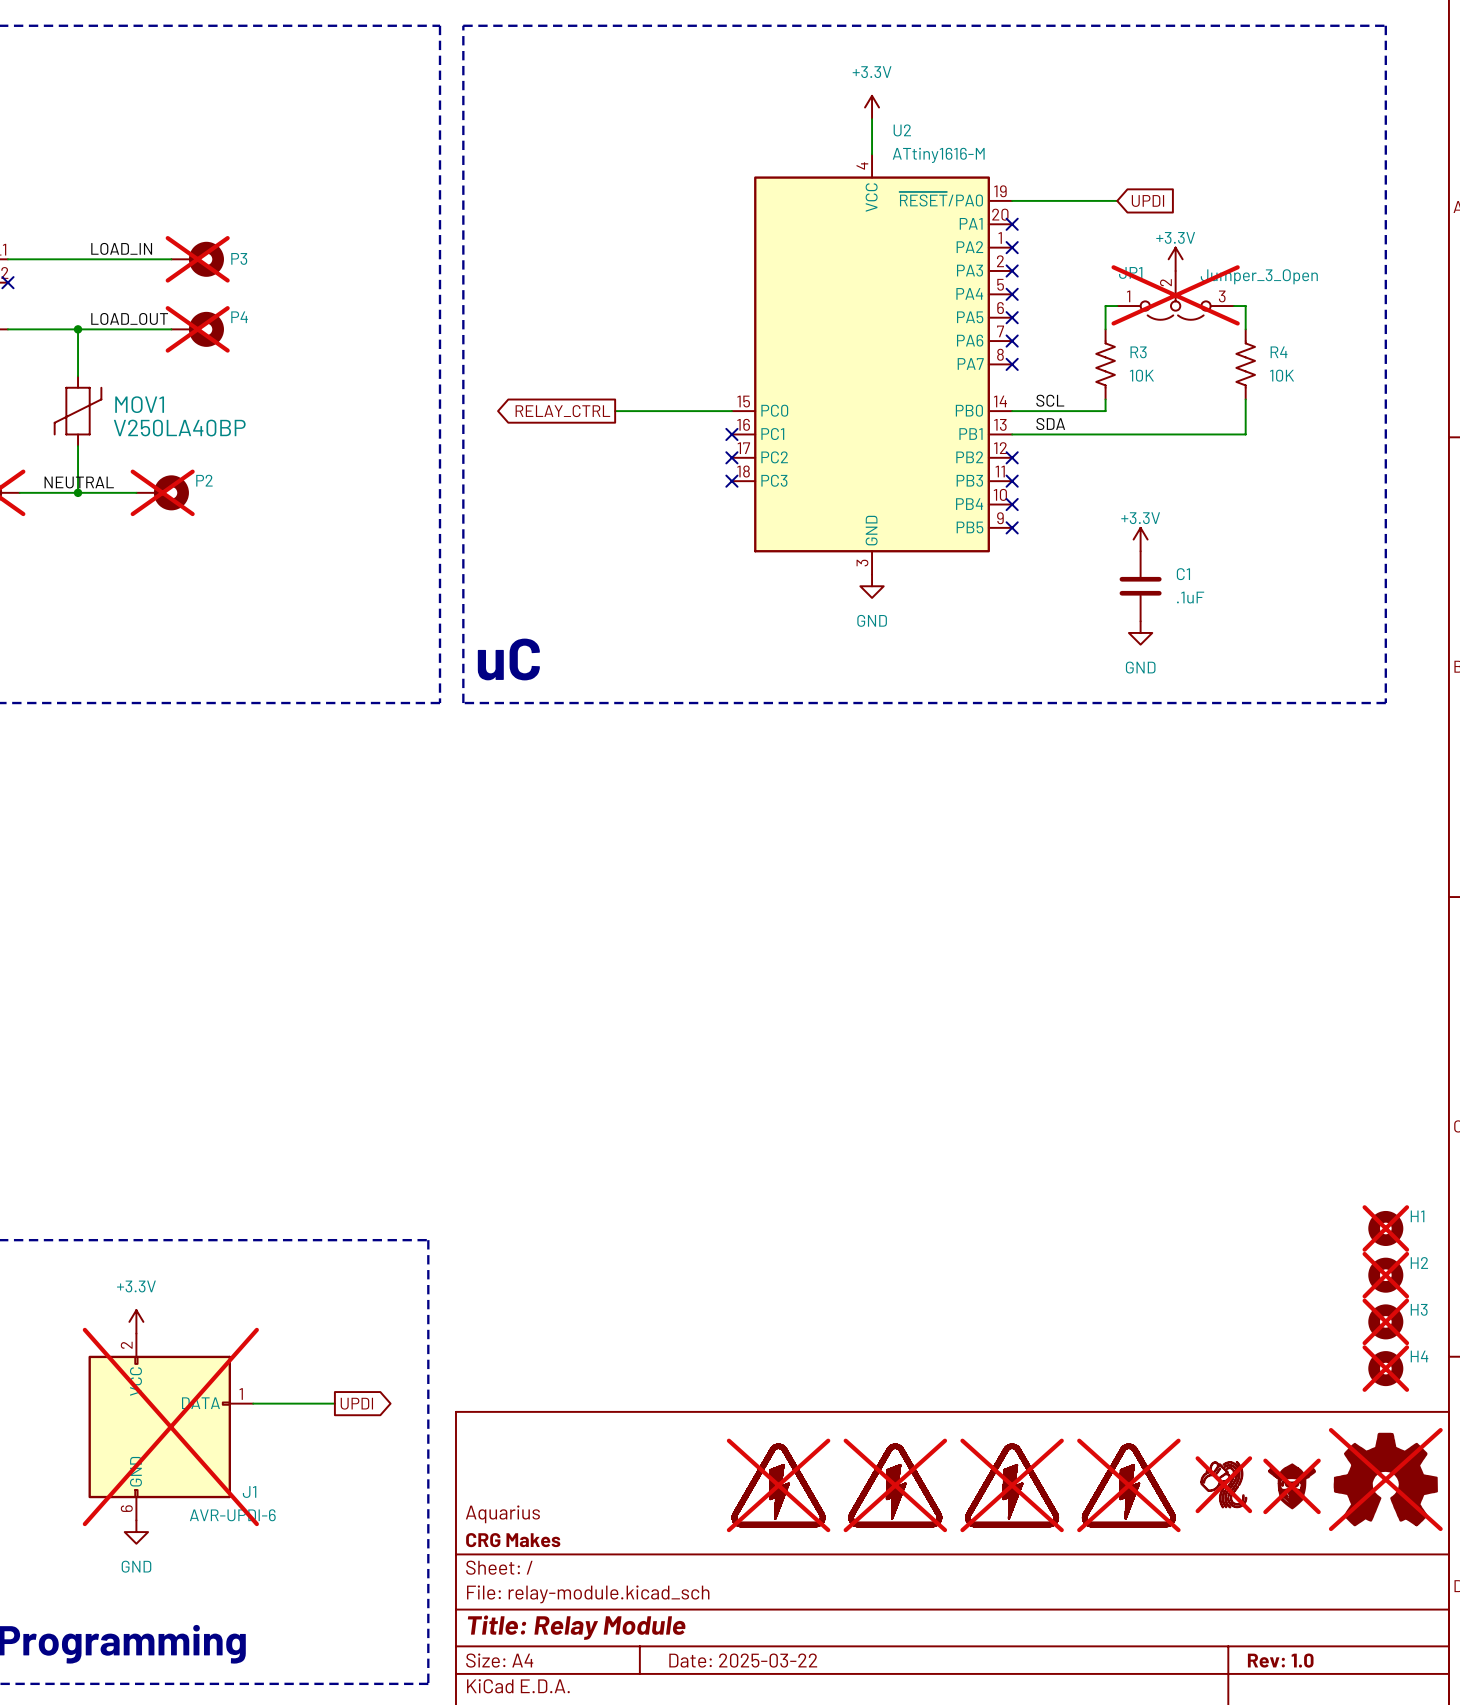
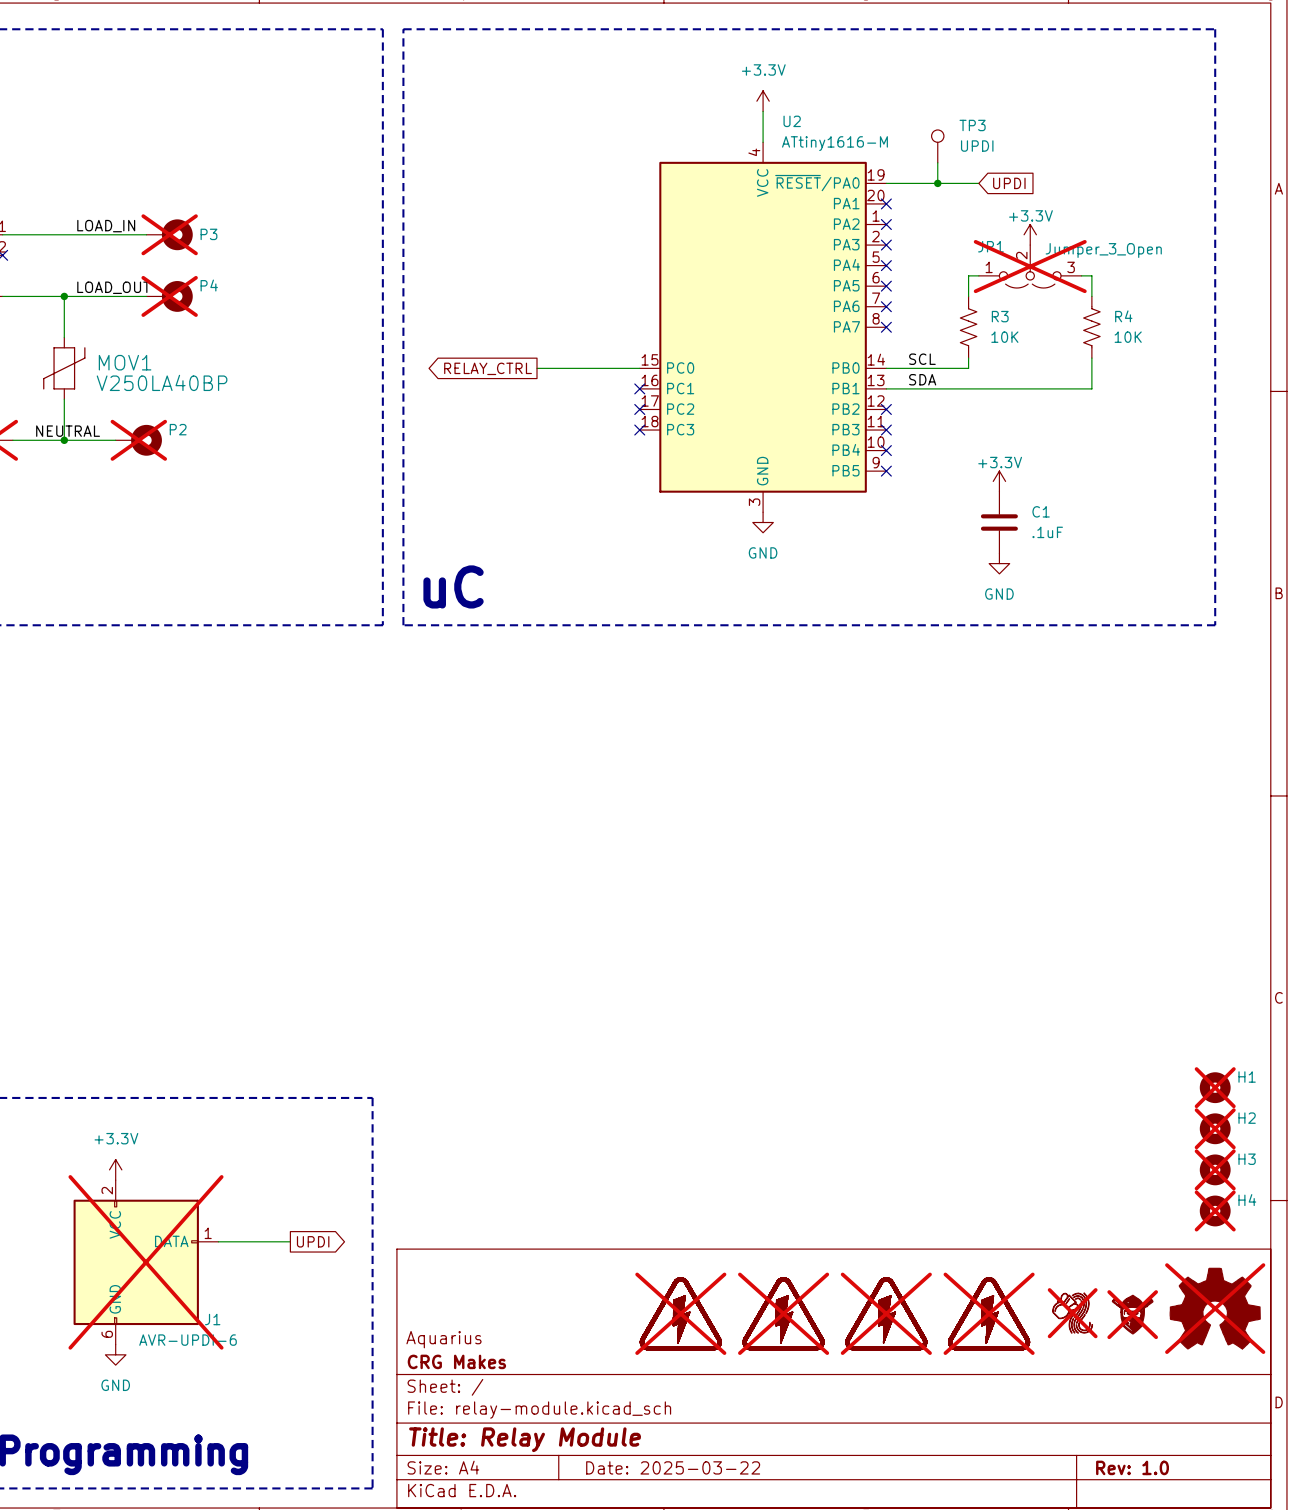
TP3: none -> UPDI (937, 146)
wire: none -> (937, 162) (937, 183)
junction: none -> (937, 183)

